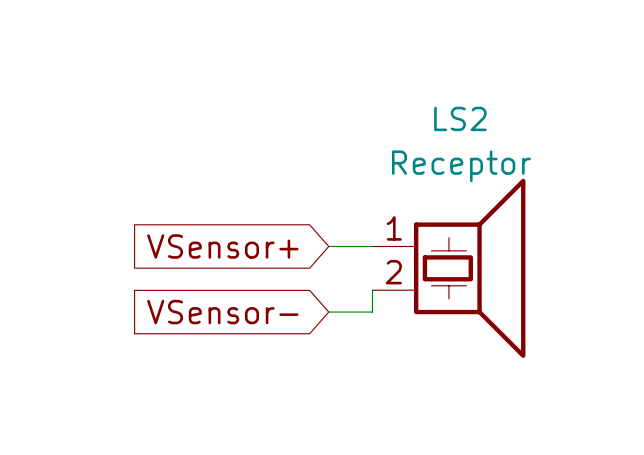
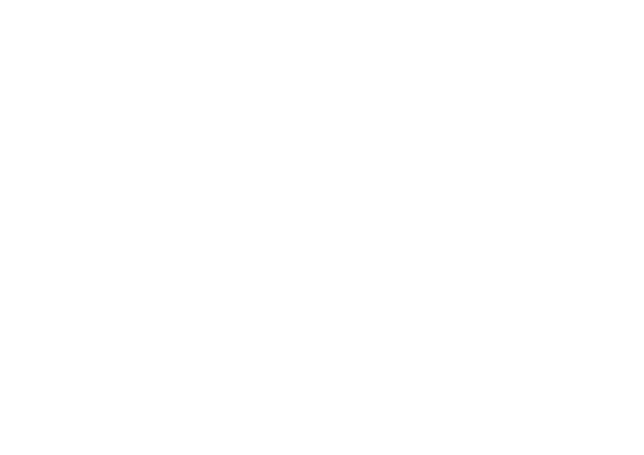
global label: VSensor+ (222, 246) -> none
wire: (328, 246) (372, 246) -> none
LS2: Receptor (448, 268) -> none
wire: (372, 290) (372, 312) (328, 312) -> none
global label: VSensor- (222, 312) -> none

